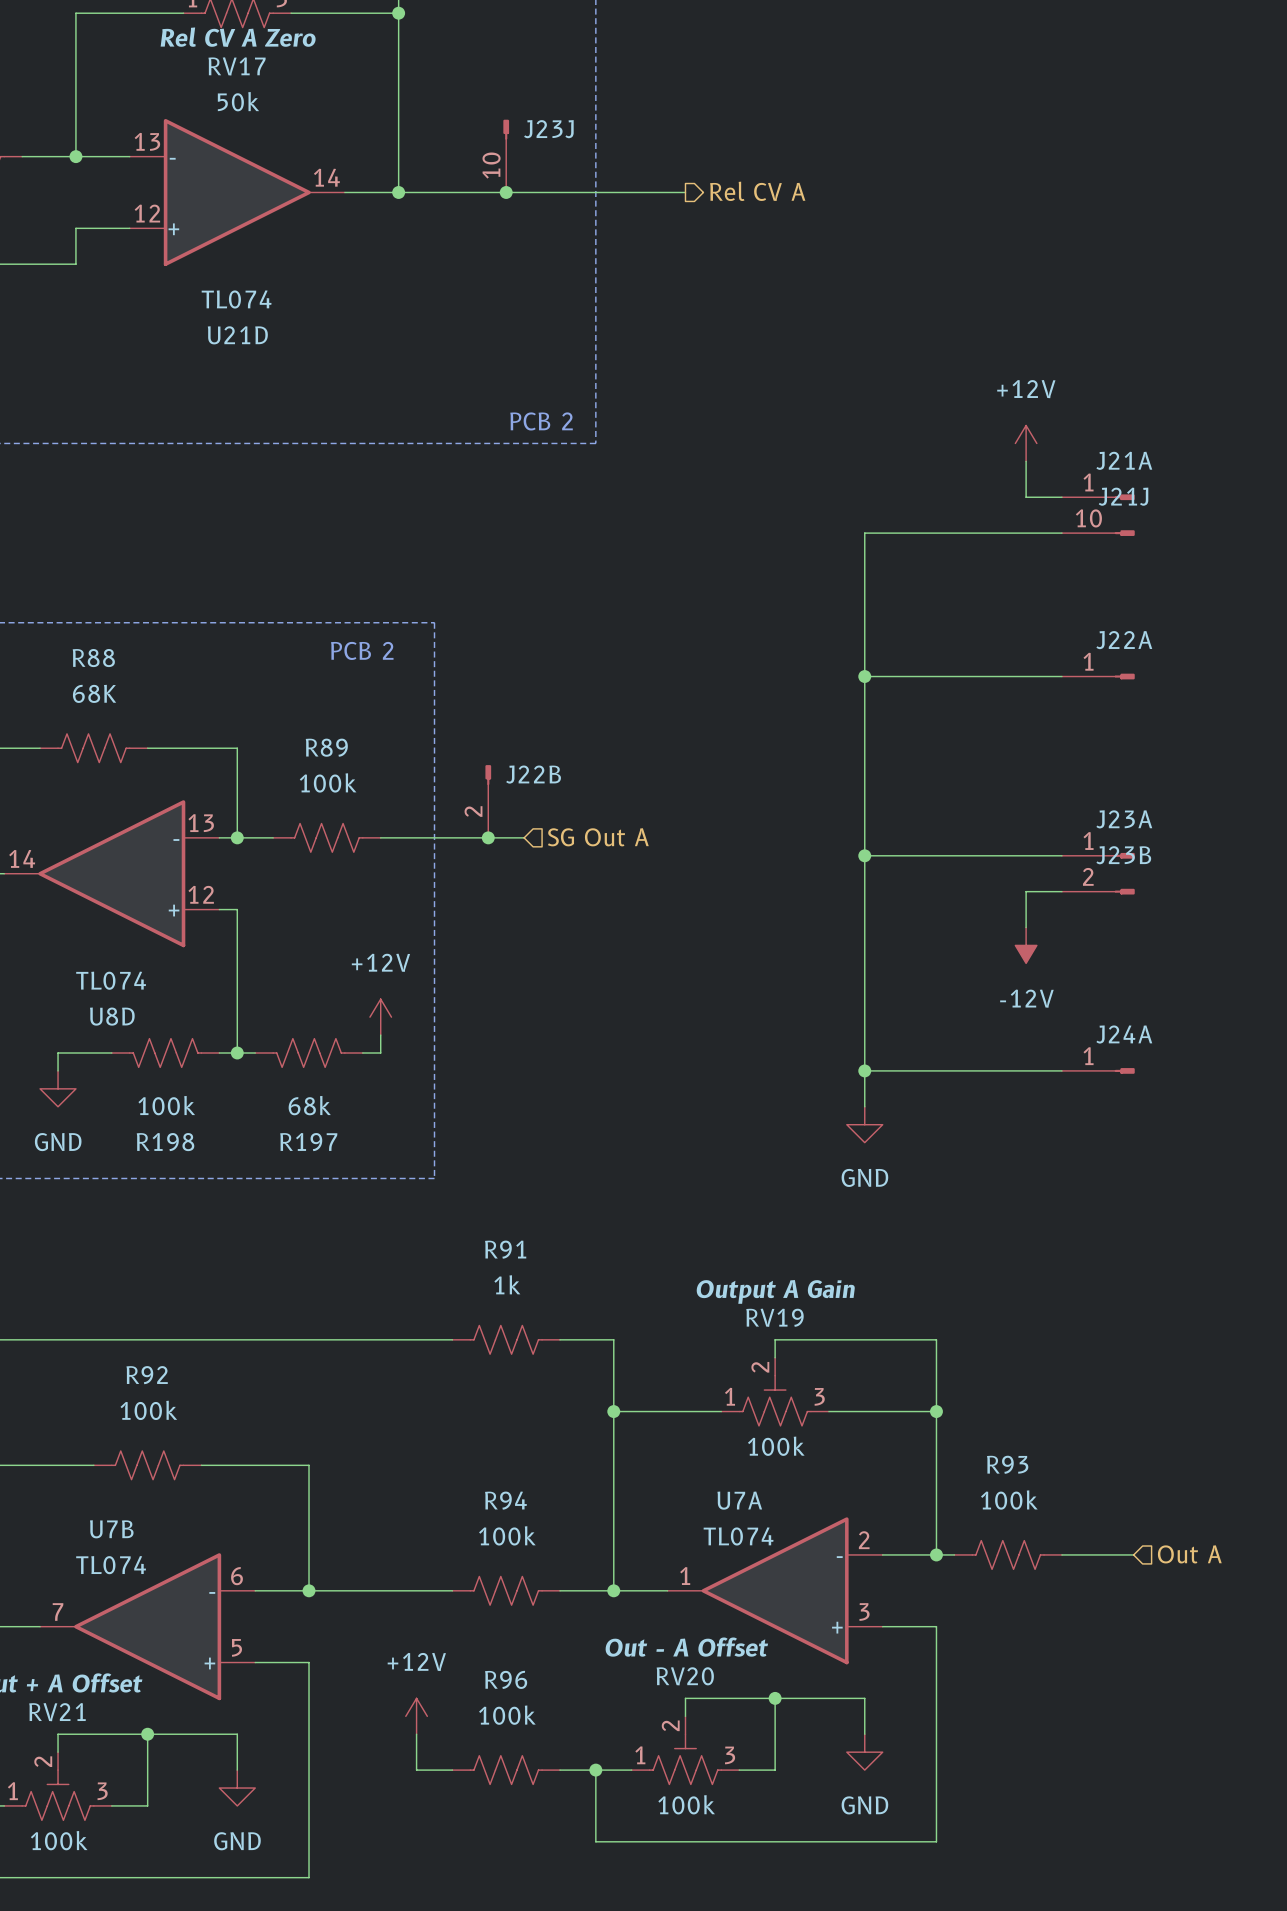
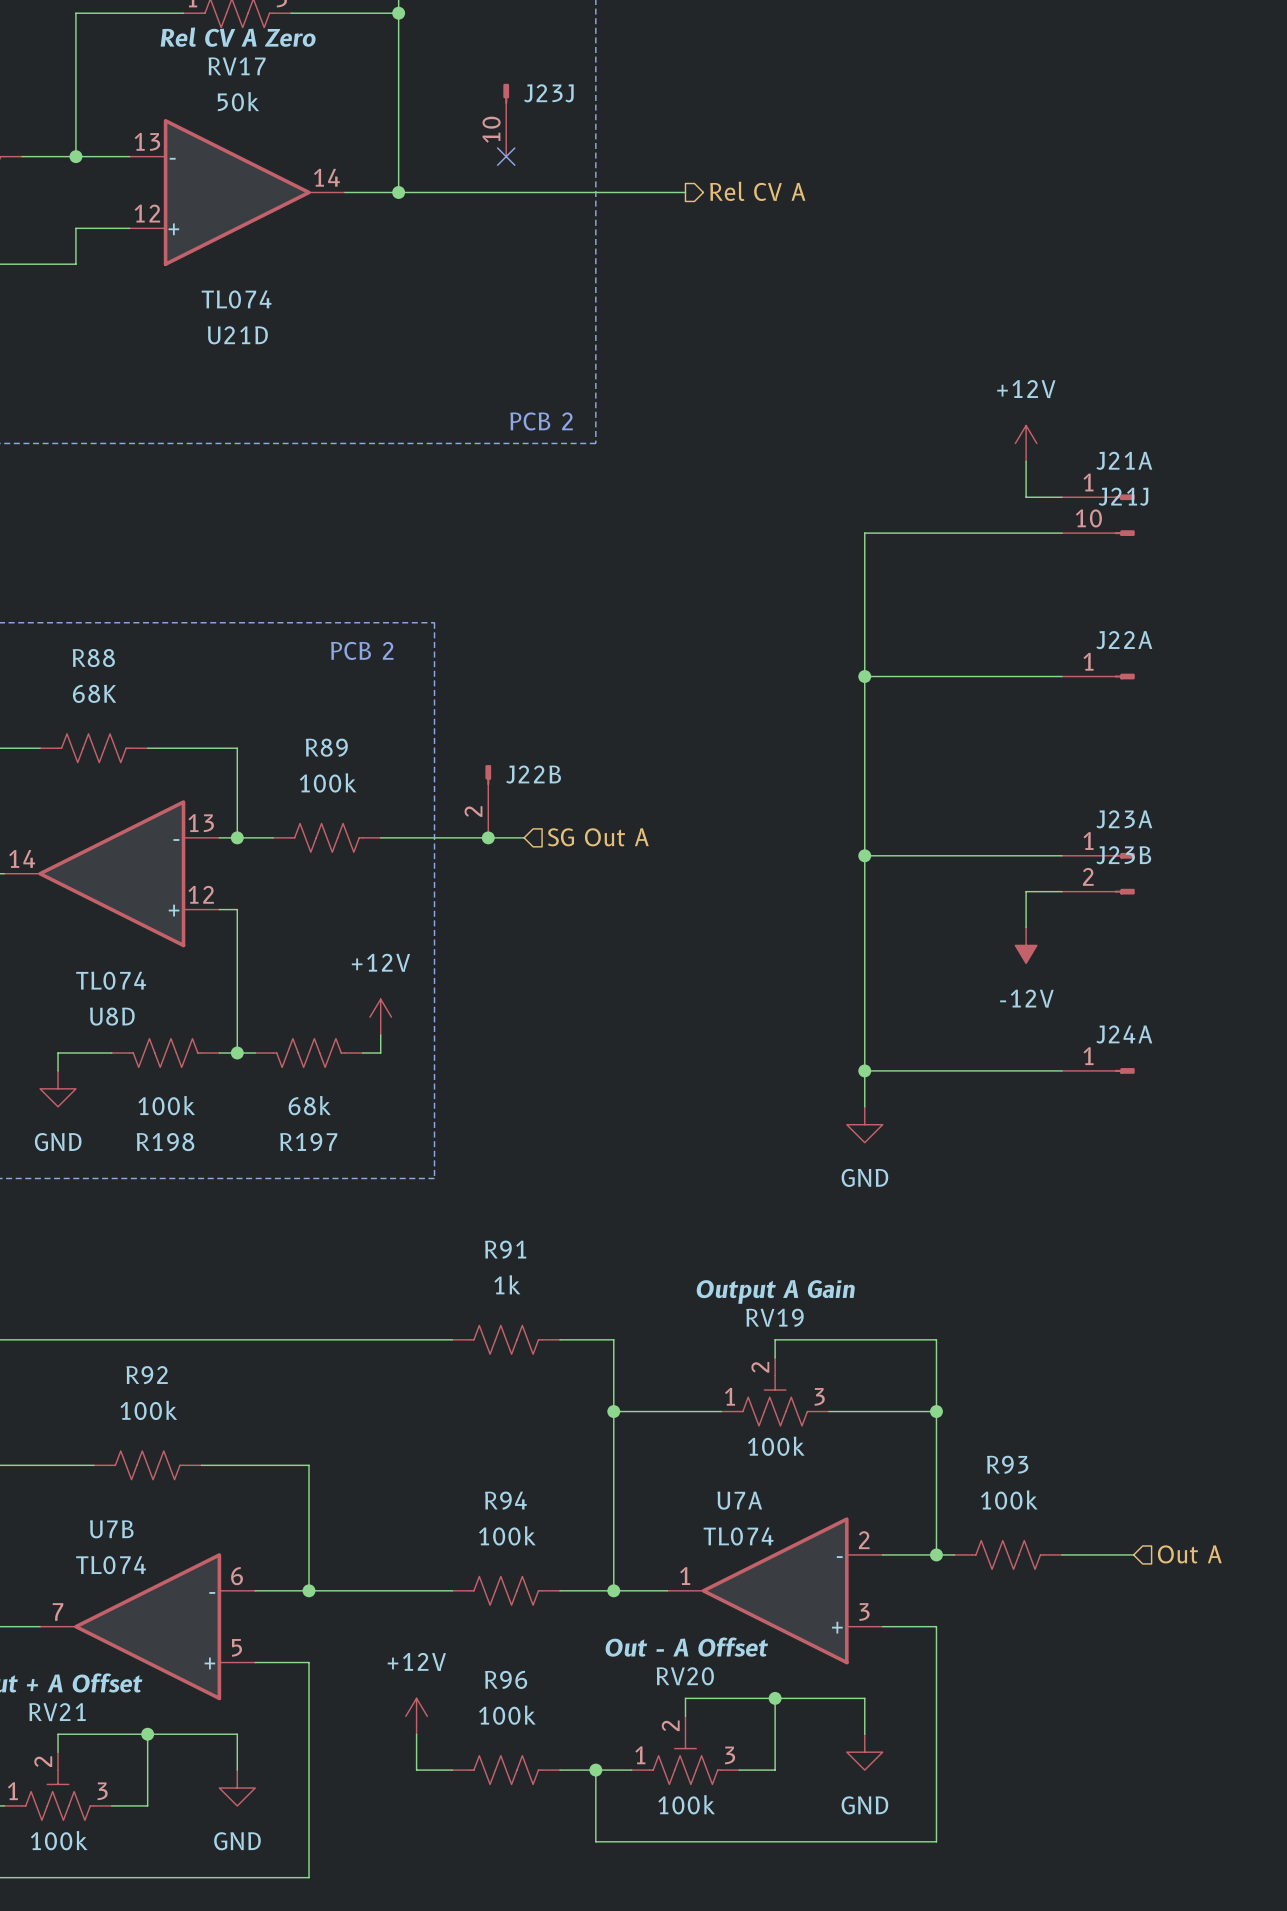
J23J position: (506, 156) -> (506, 120)
no-connect mark: none -> (506, 156)
junction: (506, 192) -> none

